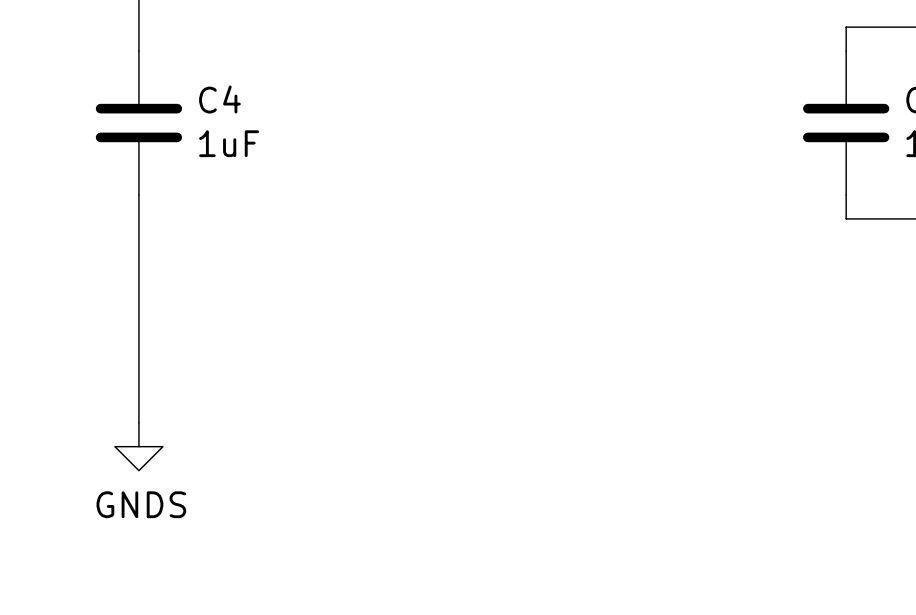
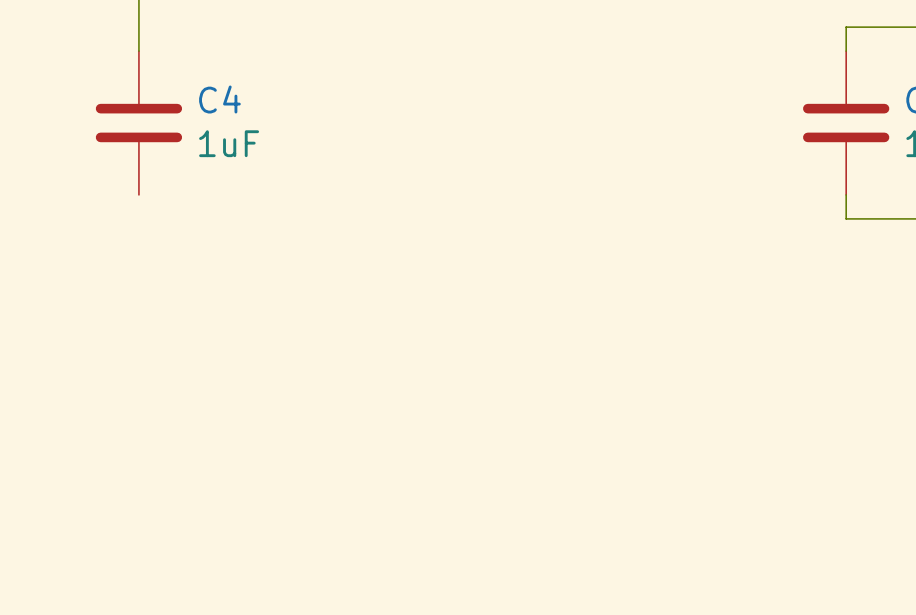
wire: (138, 194) (138, 422) -> none
power symbol: GNDS (138, 446) -> none

